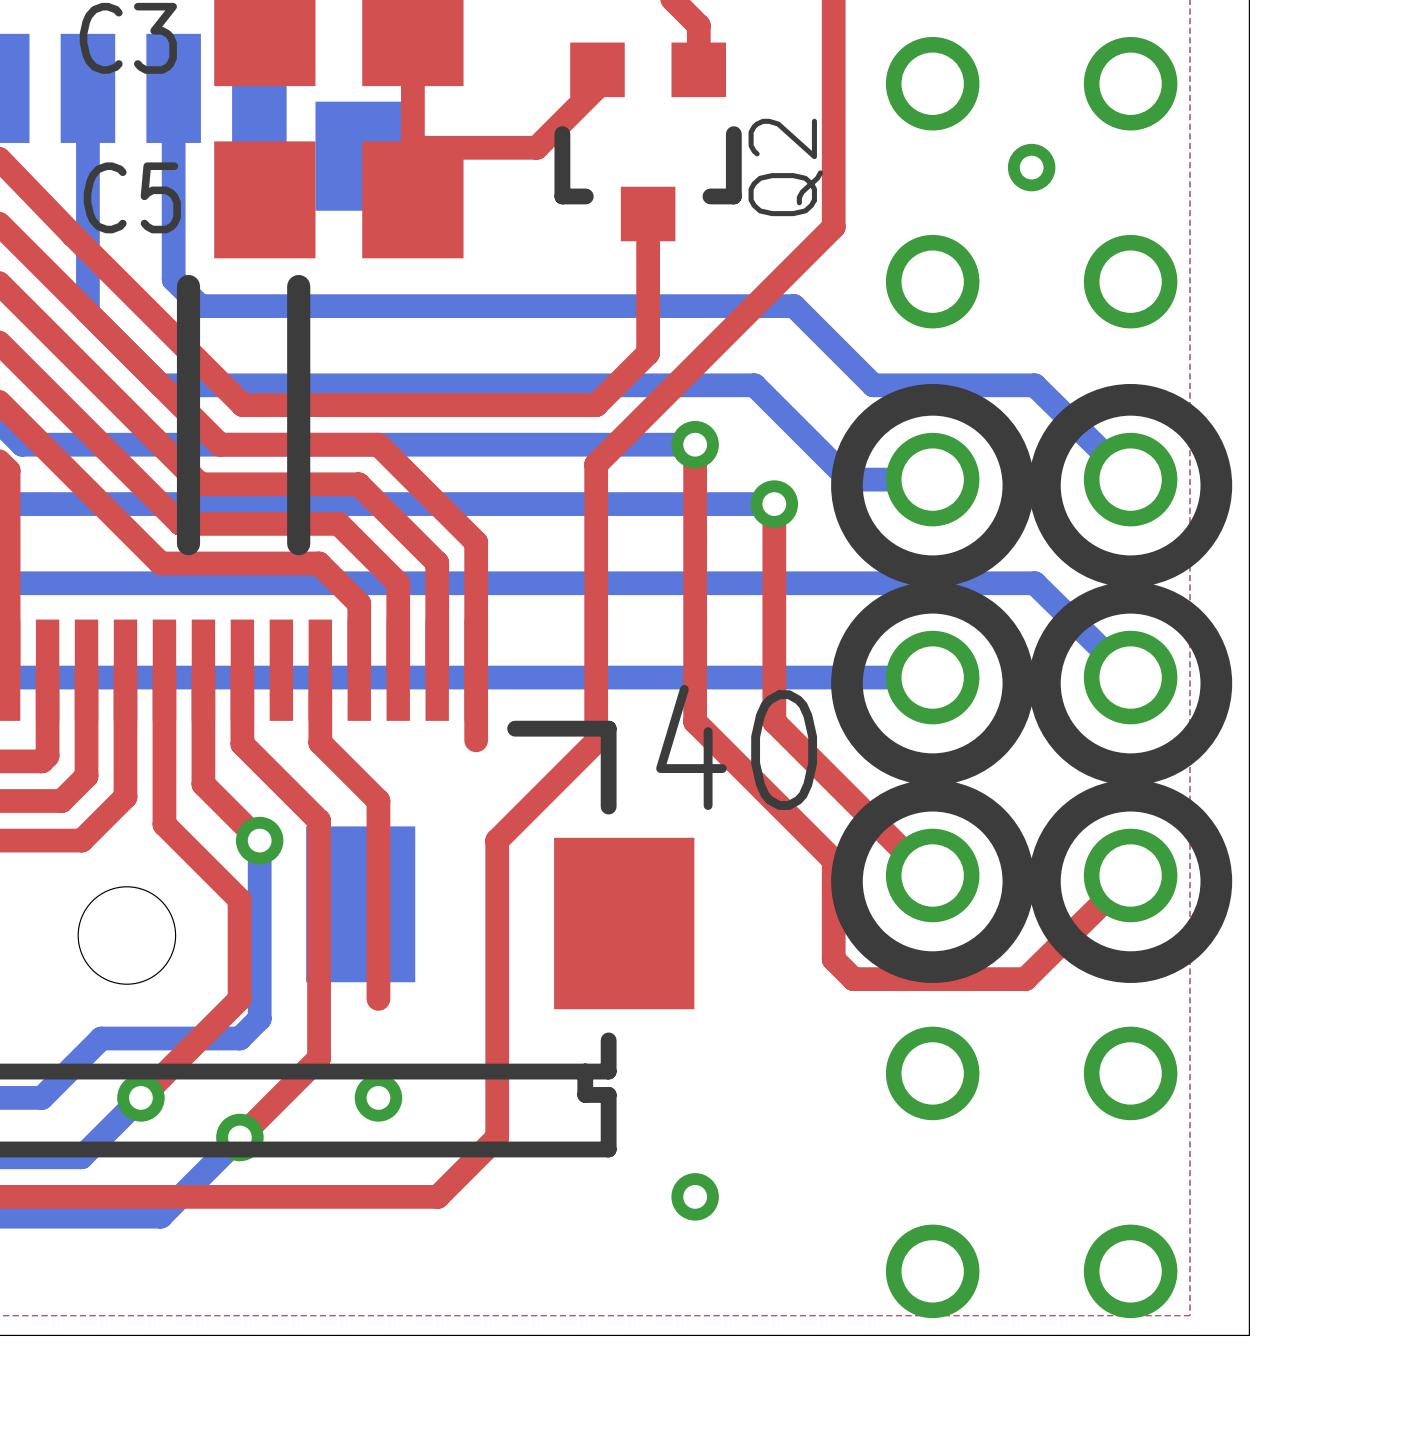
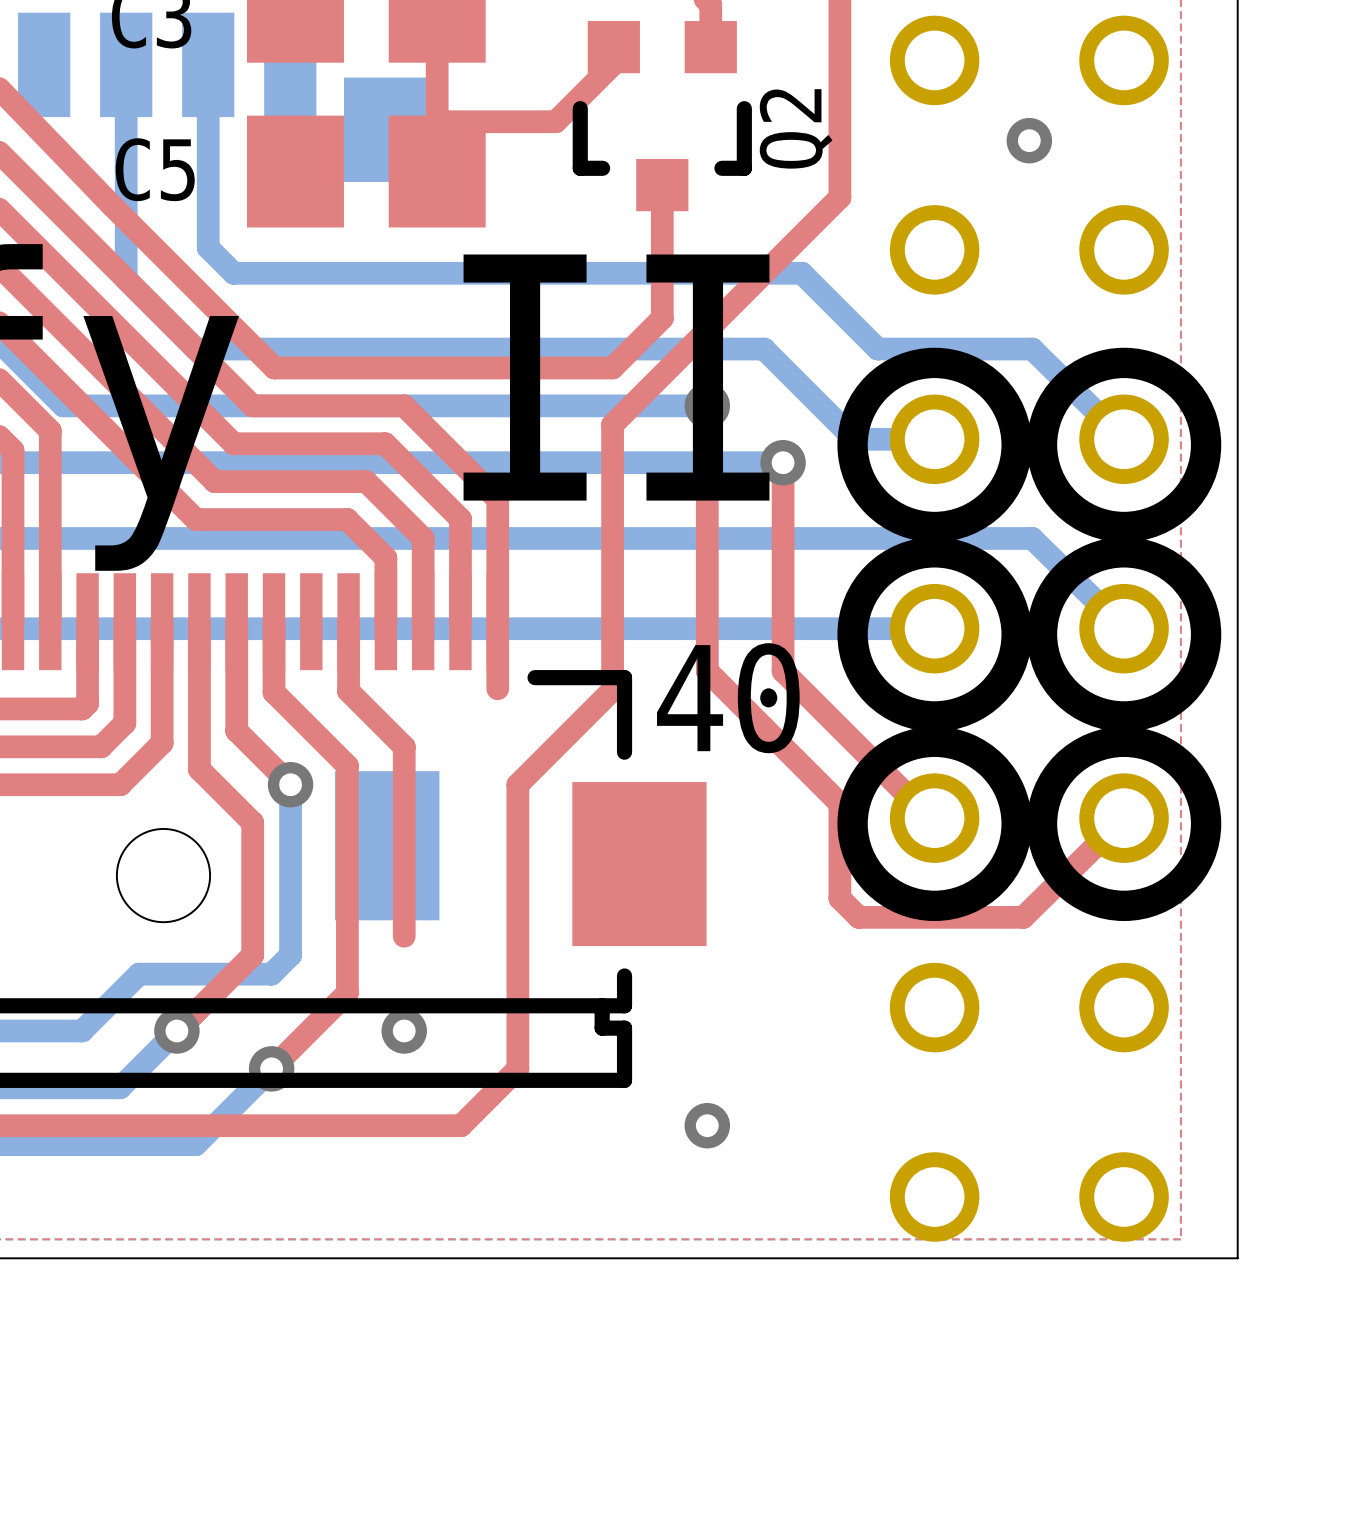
top track: (220, 880) (239, 899) (239, 999) (220, 1018) -> (252, 822) (252, 955)

